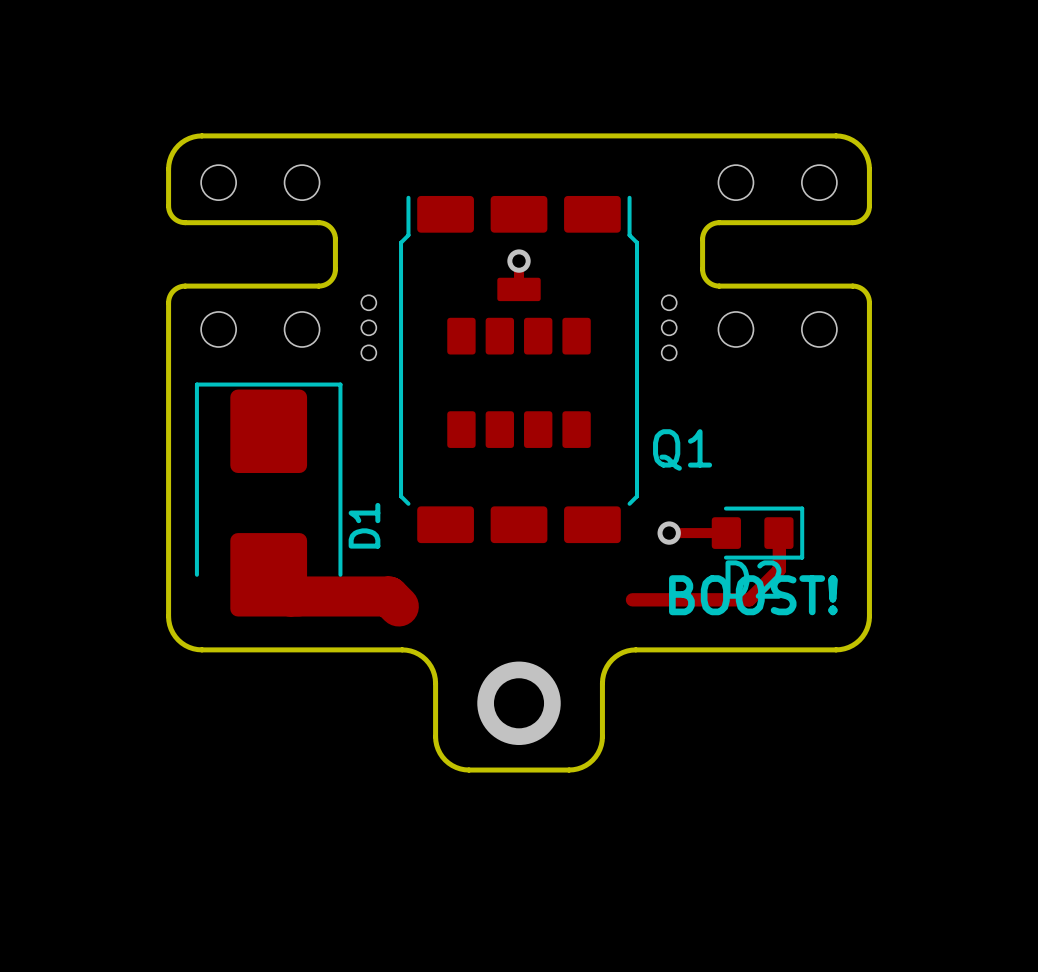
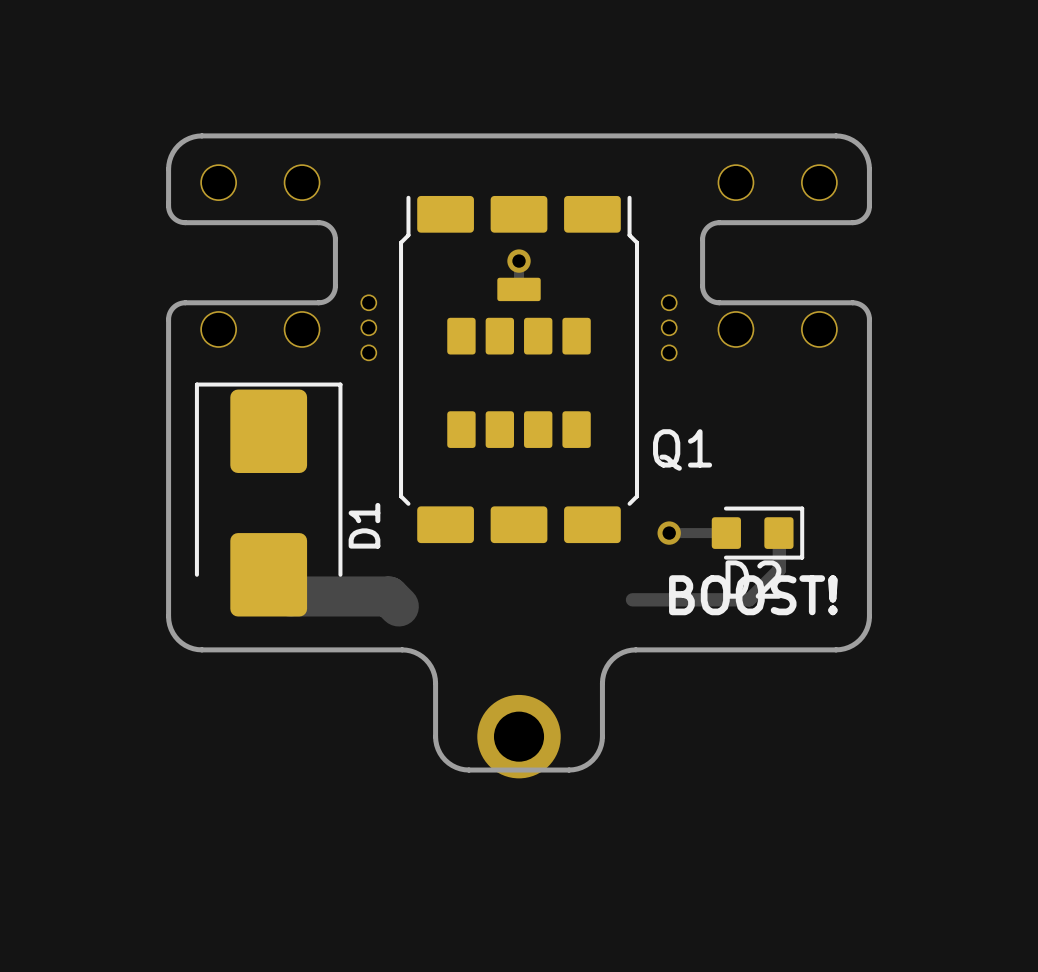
board edge: (335, 269) (330, 281) (320, 285) (180, 286) (175, 289) (169, 296) (168, 319) -> (335, 269) (334, 292) (328, 299) (323, 302) (183, 302) (173, 307) (168, 319)
board edge: (702, 269) (707, 281) (717, 285) (857, 286) (862, 289) (868, 296) (869, 319) -> (702, 269) (703, 292) (709, 299) (714, 302) (854, 302) (864, 307) (869, 319)
via position: (519, 703) -> (519, 736)

